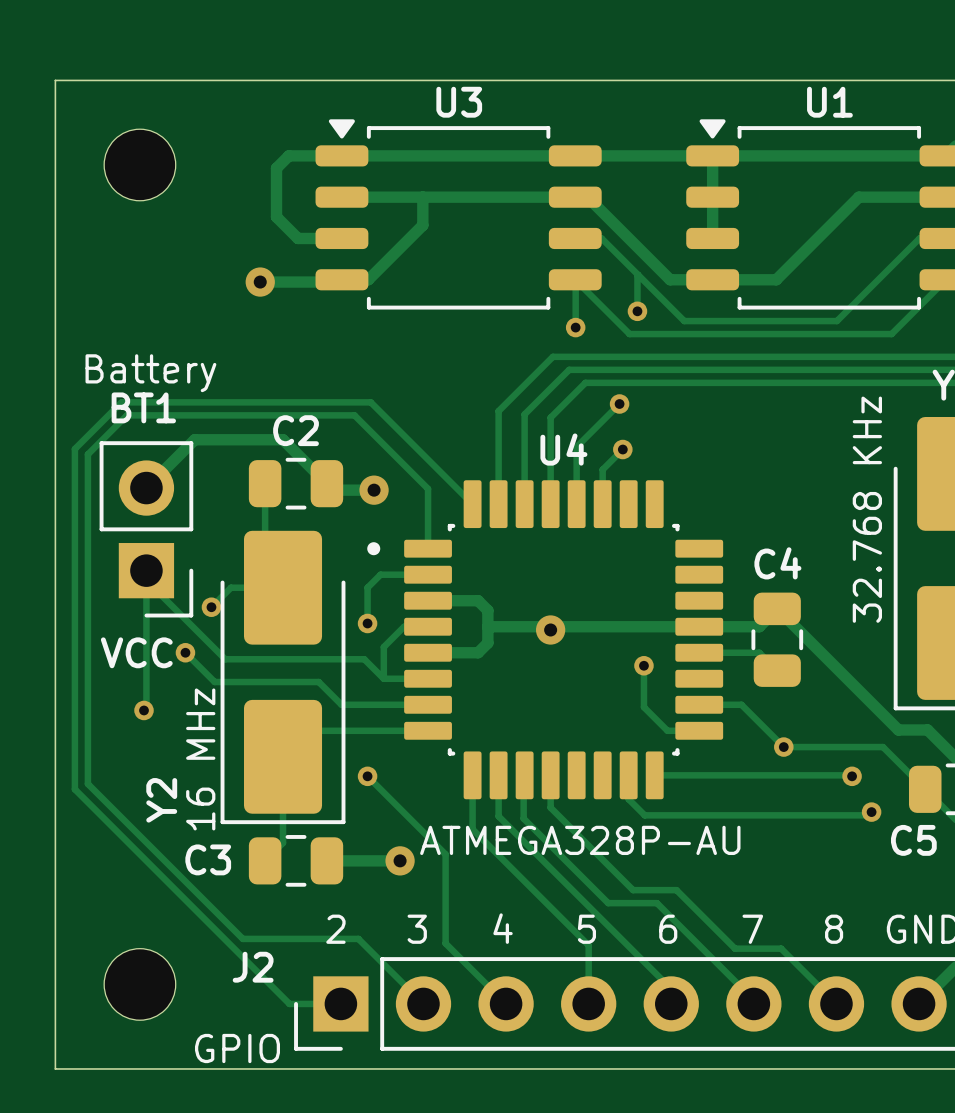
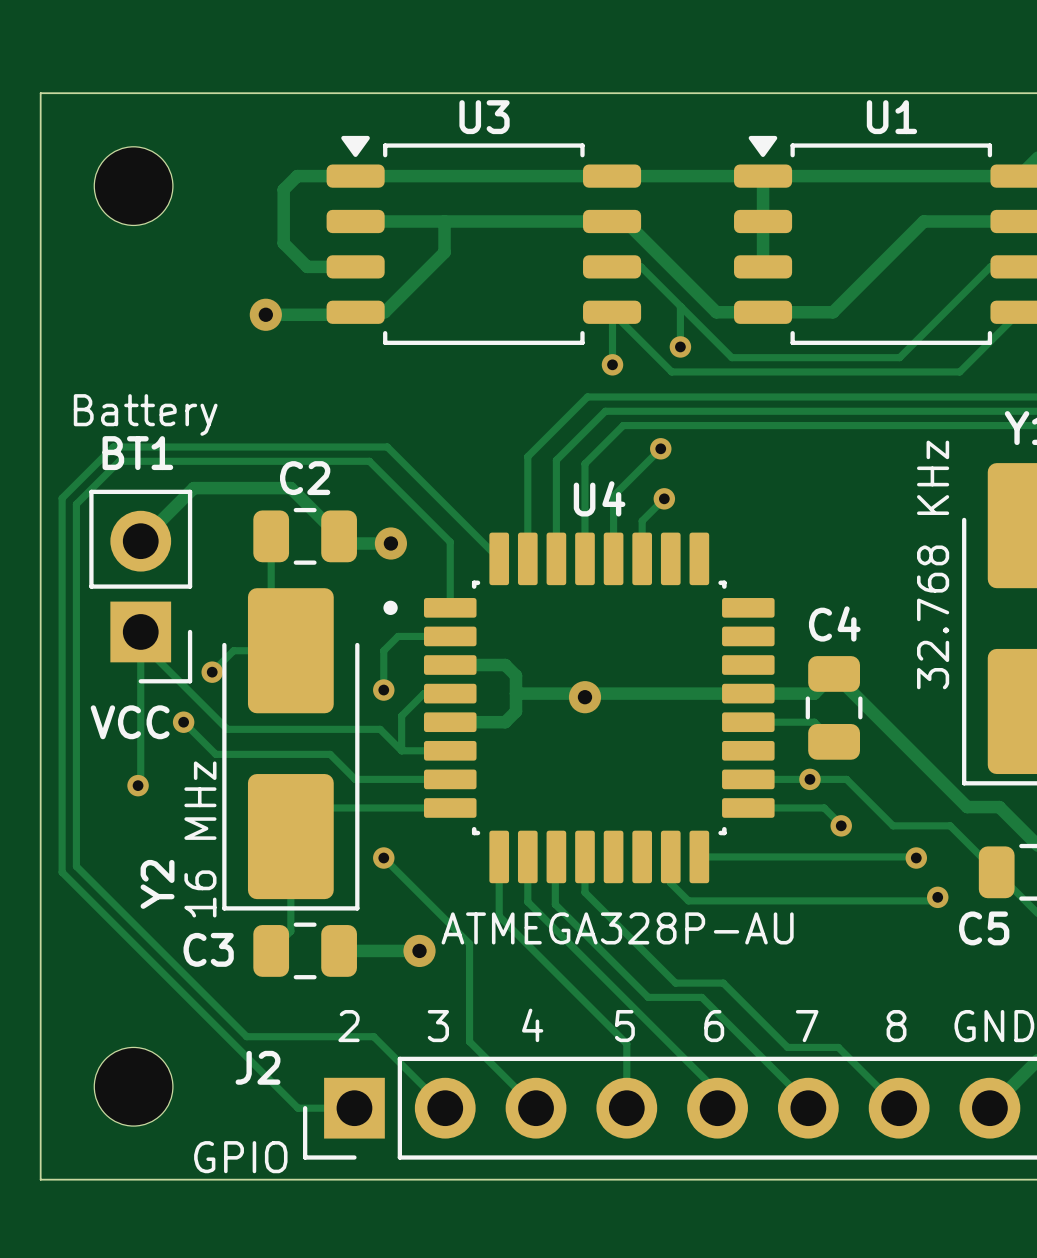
track: (643, 665) (643, 707) (667, 730) (699, 730) -> (841, 824) (824, 807) (748, 807)
via position: (643, 665) -> (809, 779)
track: (741, 704) (783, 747) (830, 747) -> (794, 779) (846, 779) (893, 825)

